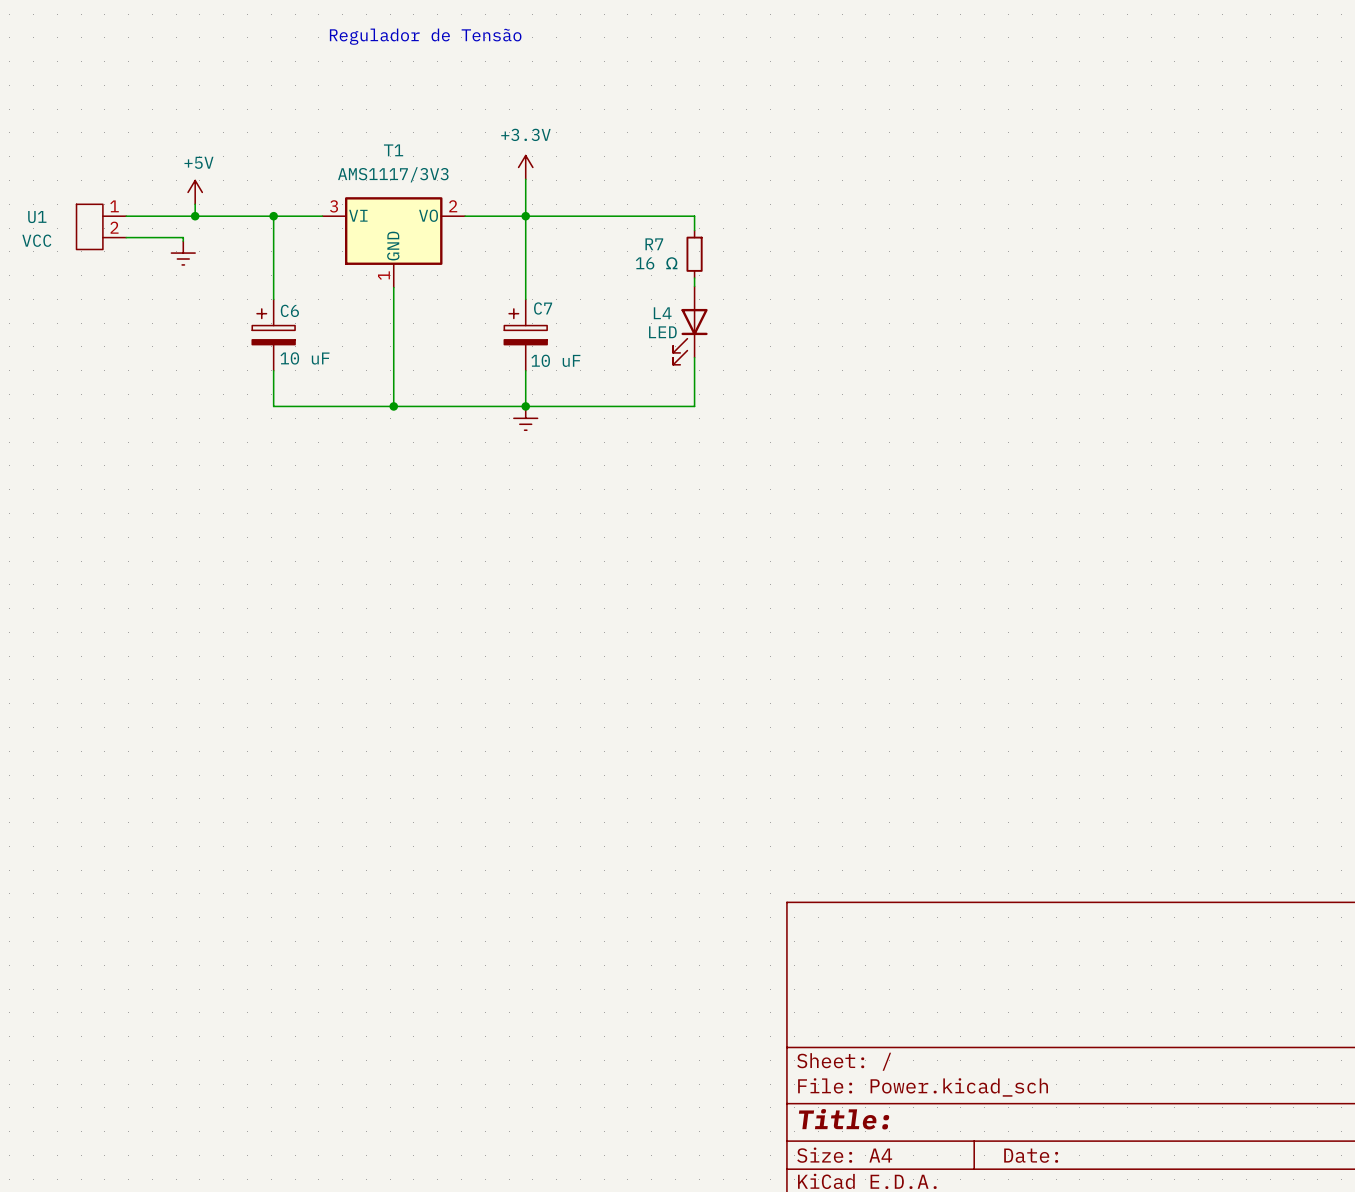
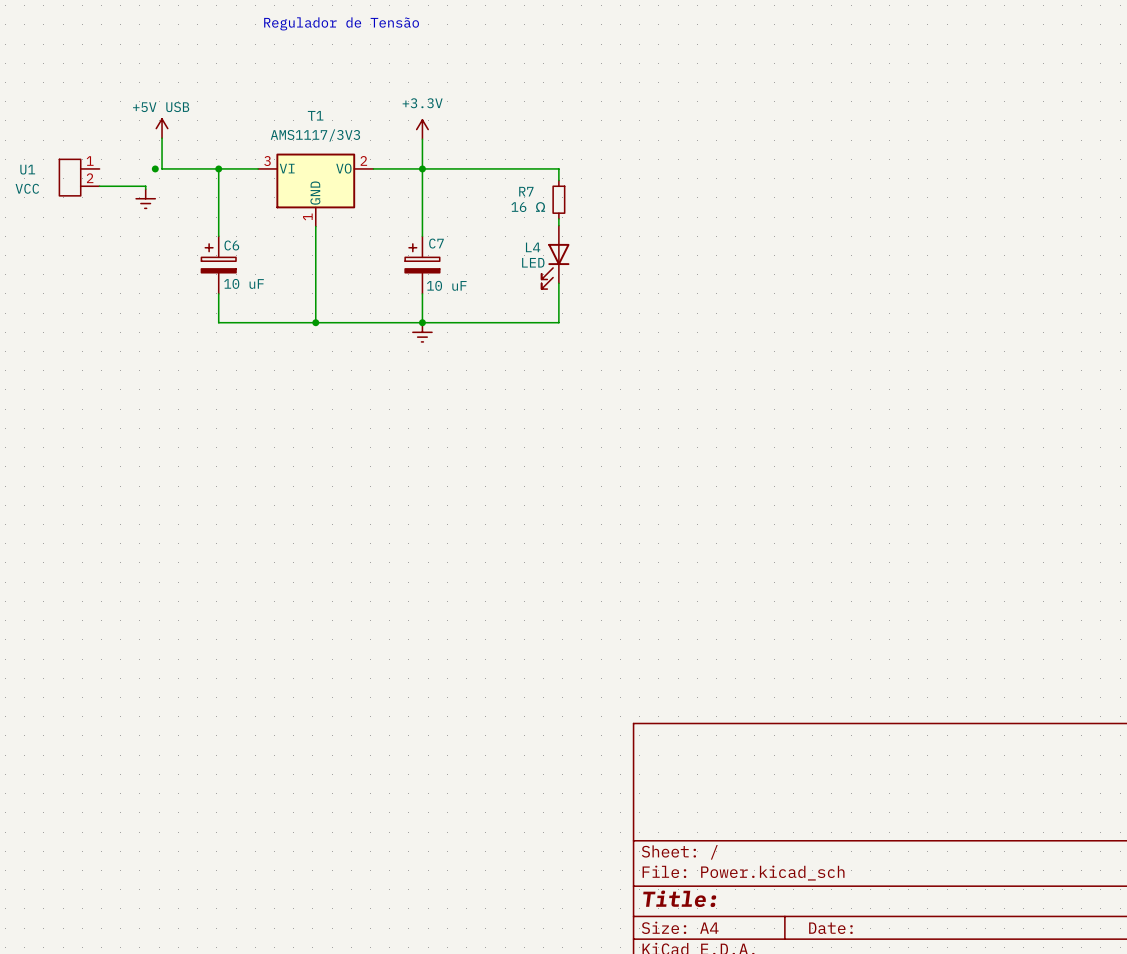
power symbol: none -> +5V USB (162, 128)
power symbol: +5V (195, 192) -> none
wire: (195, 204) (195, 216) -> none
wire: (126, 216) (203, 216) -> (162, 138) (162, 168)

